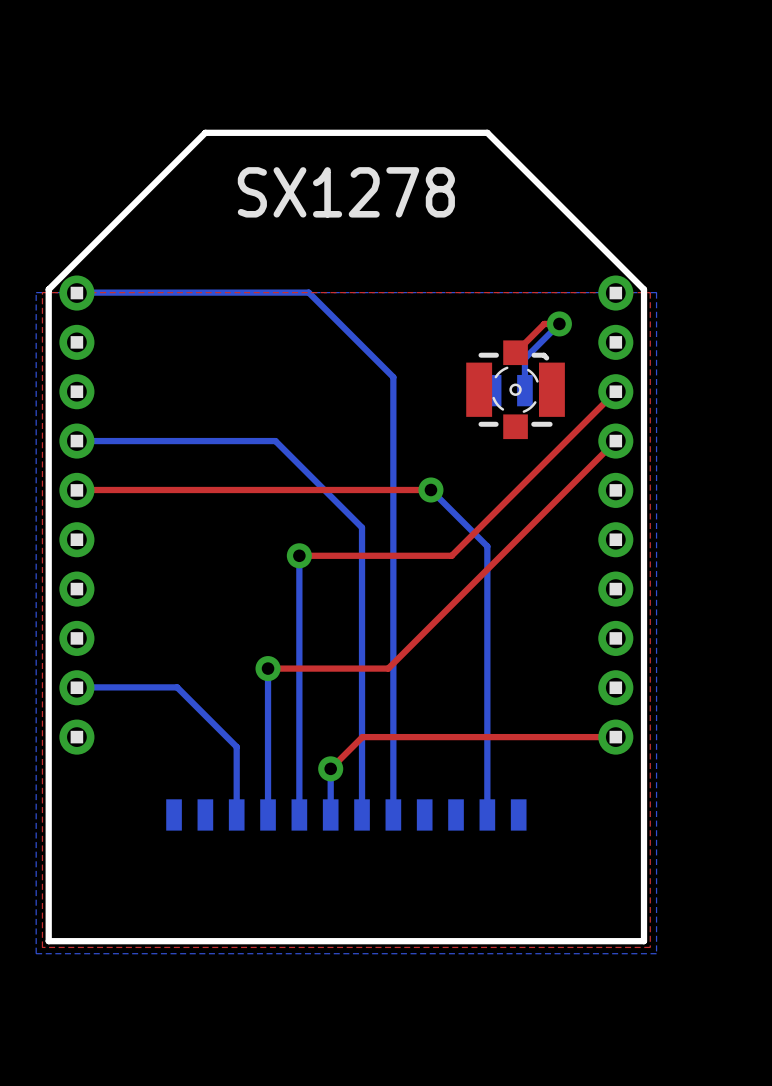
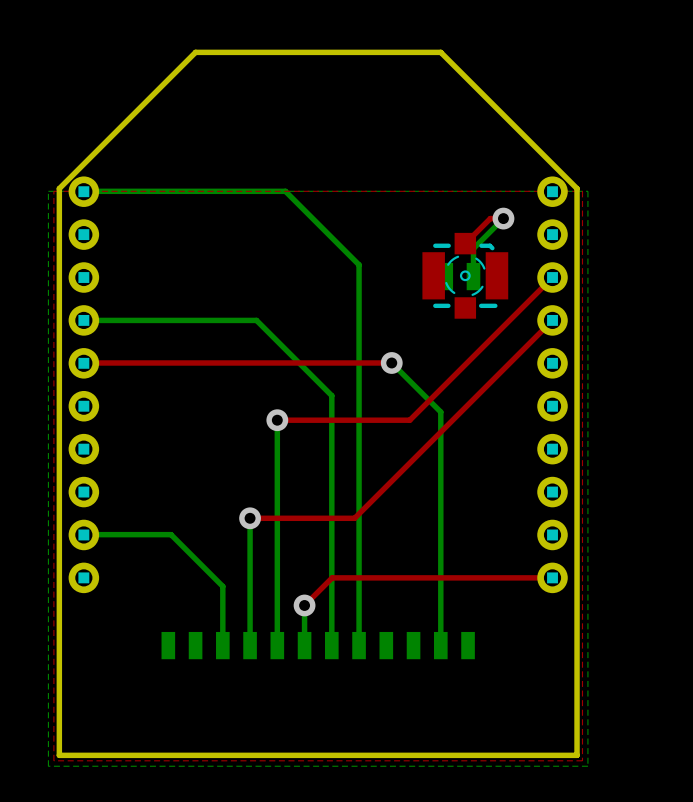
text: SX1278 (346, 192) -> none

